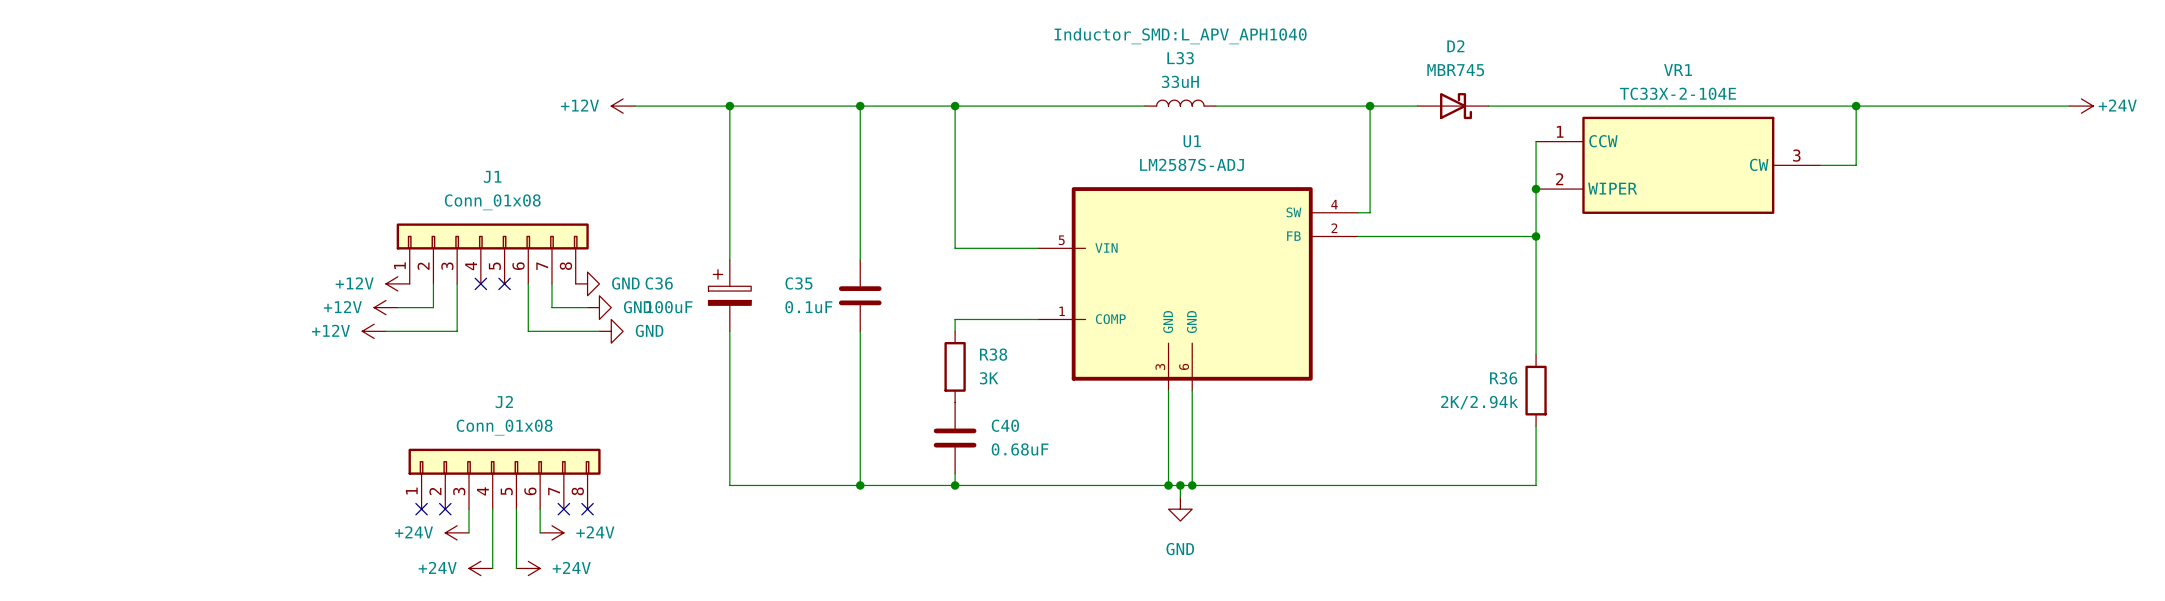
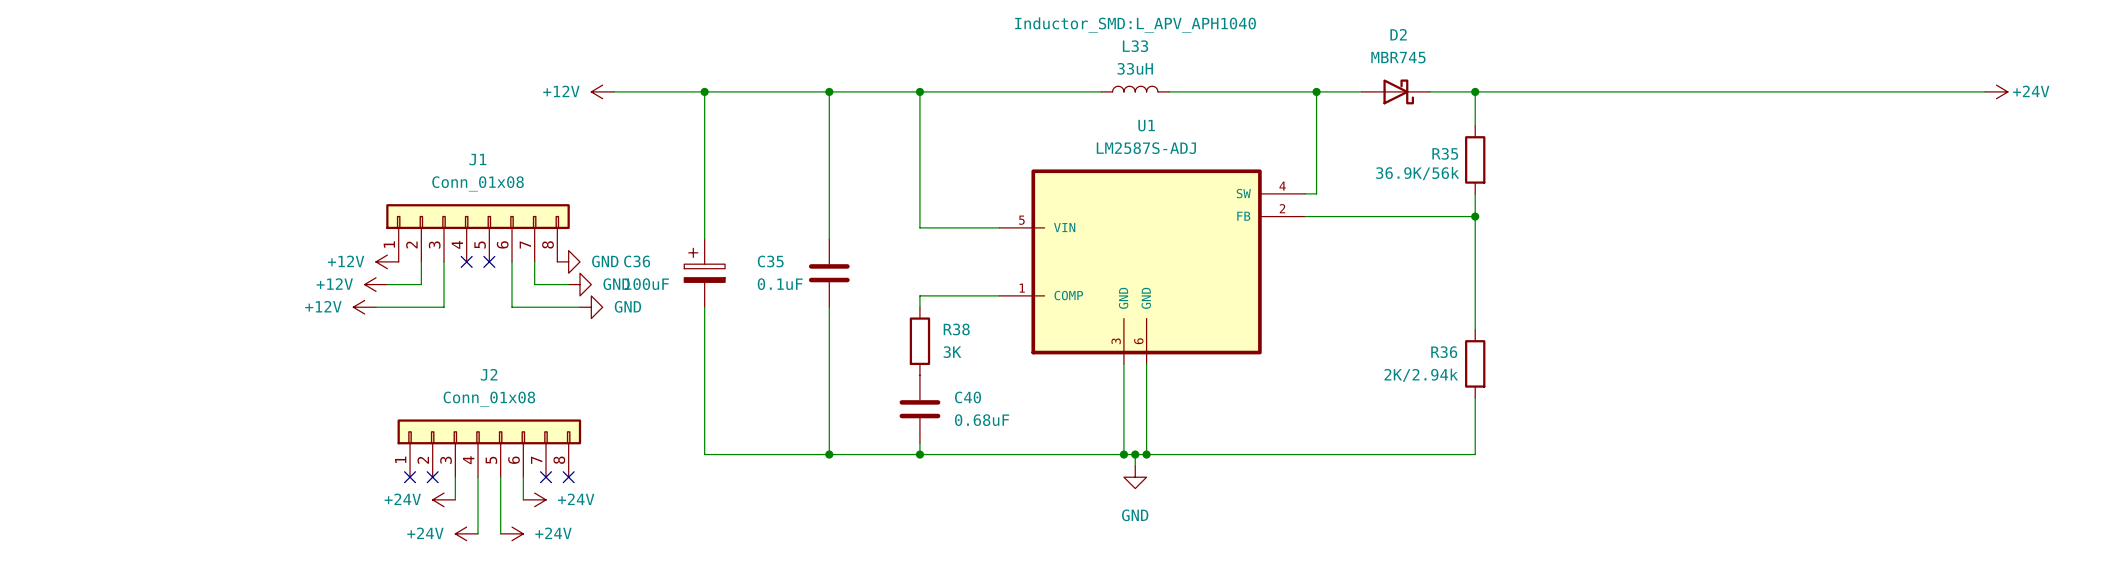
junction: none -> (1475, 91)
wire: (1856, 106) (1856, 165) (1820, 165) -> none
junction: (1856, 106) -> none
wire: (1536, 141) (1536, 212) -> (1475, 125) (1475, 91)
VR1: TC33X-2-104E (1678, 165) -> none
R35: none -> 36.9K/56k (1475, 159)
junction: (1536, 189) -> none

